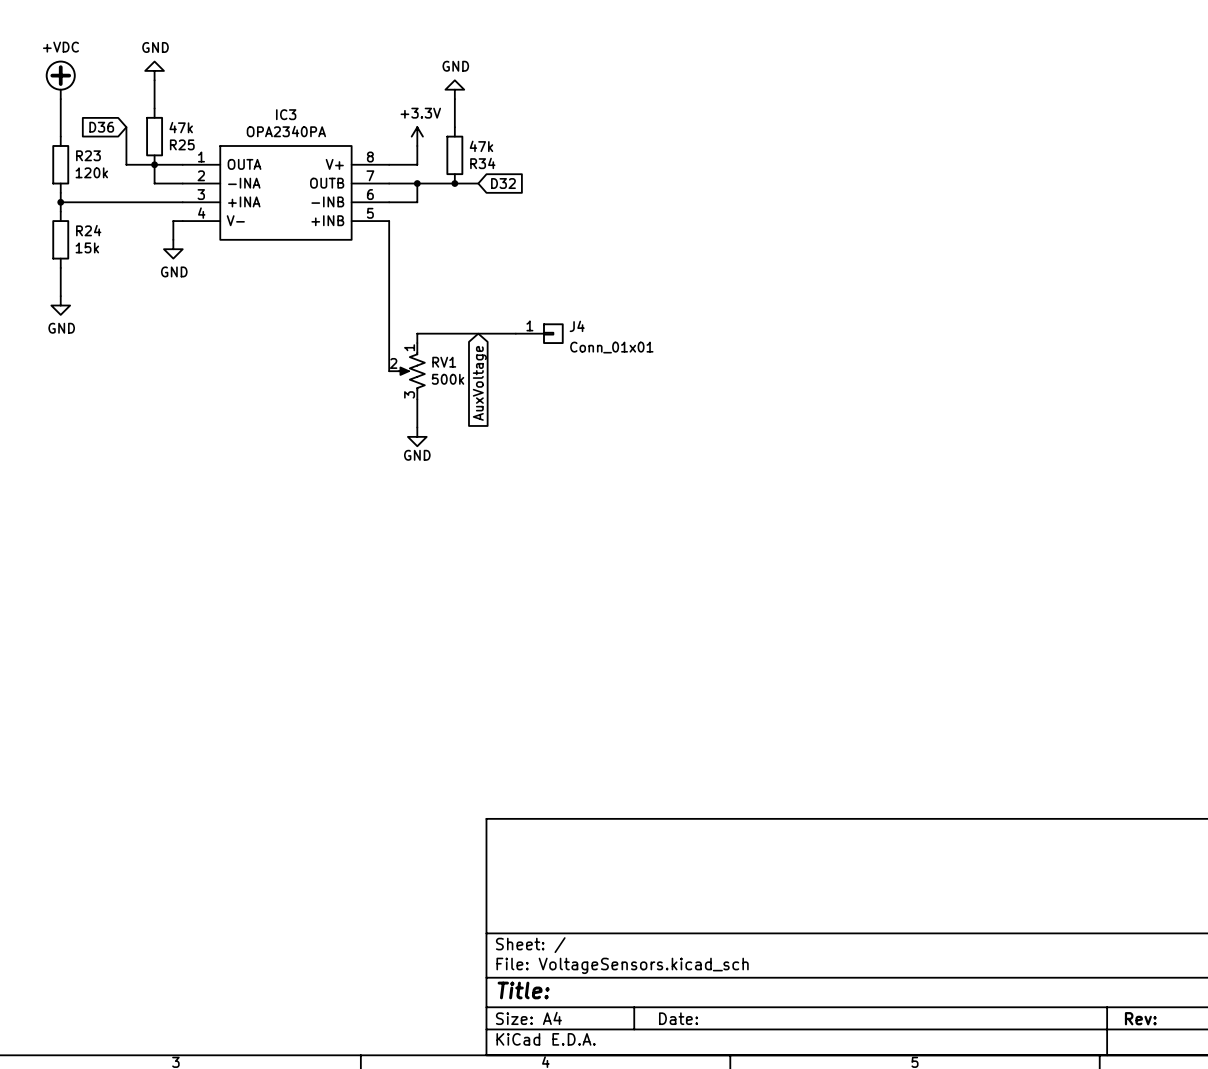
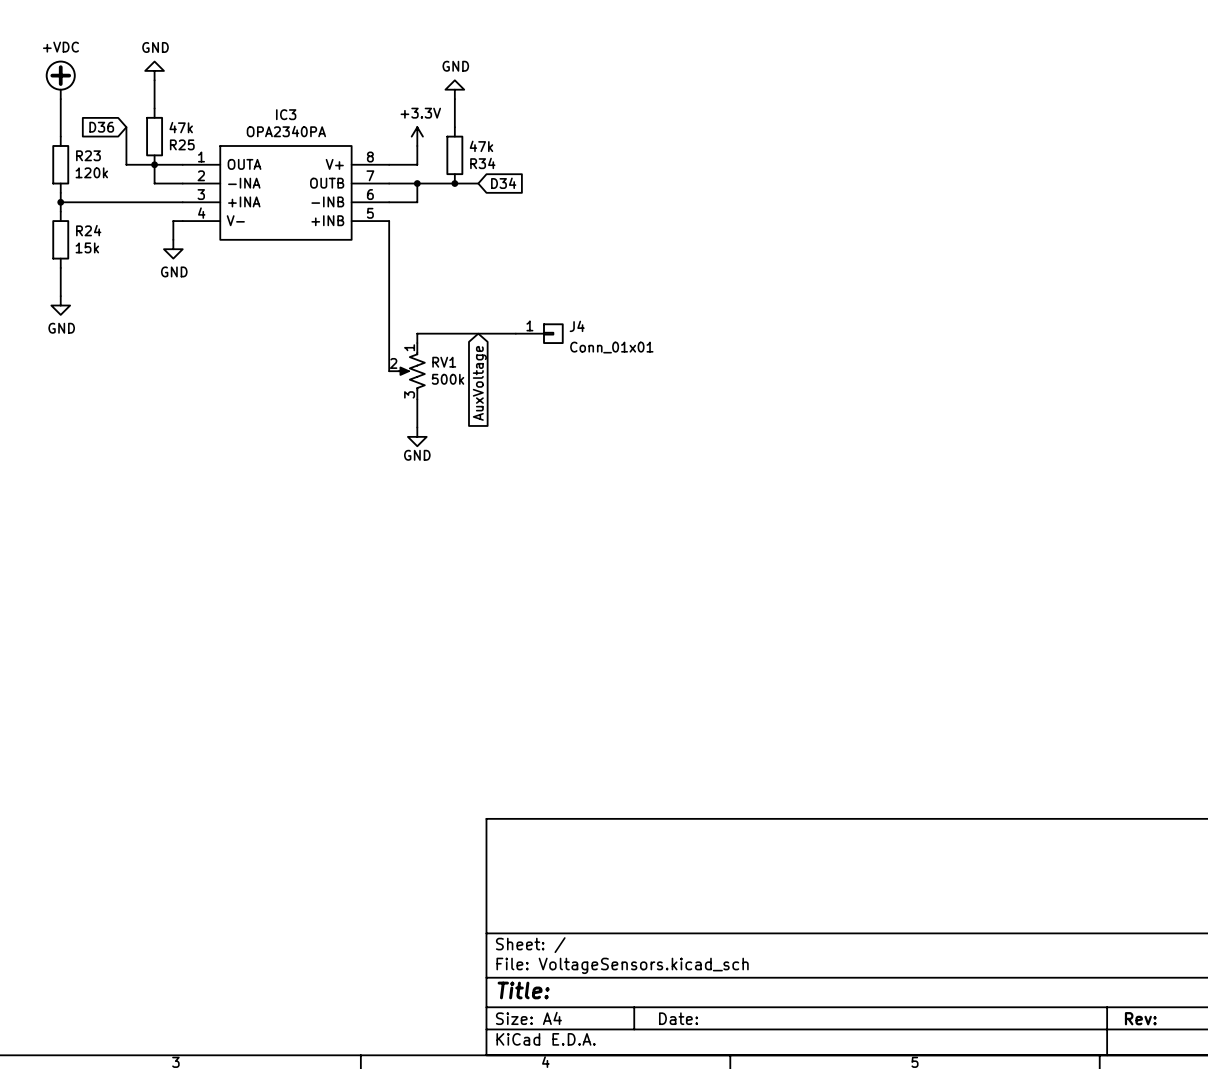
global label: D32 (503, 183) -> D34 (503, 183)

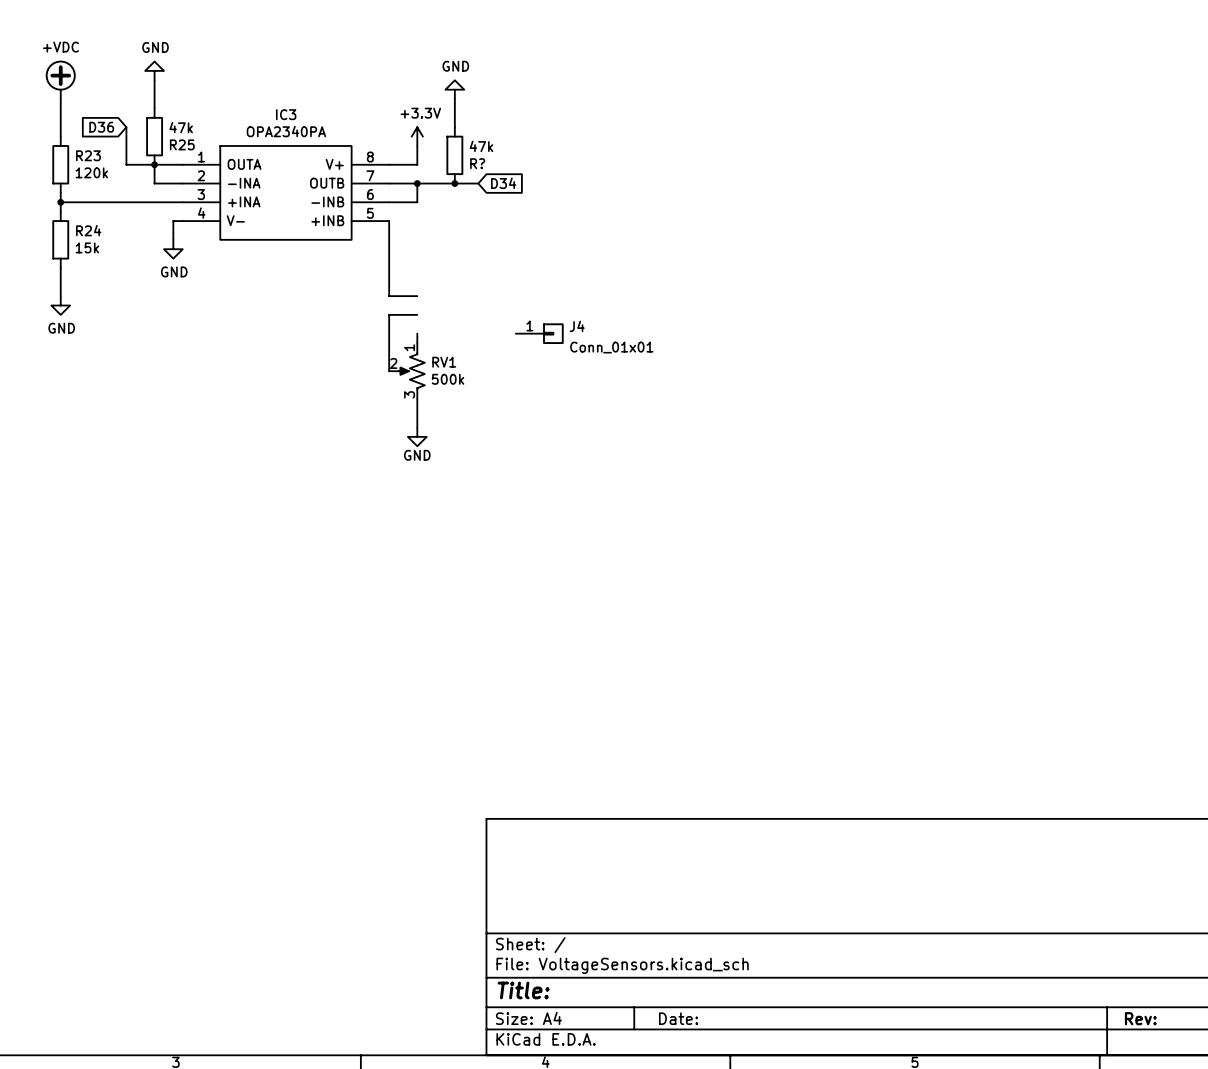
R34 name: R34 (482, 163) -> R? (477, 163)
wire: (389, 296) (389, 314) -> (389, 296) (417, 296)
wire: none -> (389, 314) (417, 314)
wire: (417, 333) (515, 333) -> none
global label: AuxVoltage (479, 383) -> none

